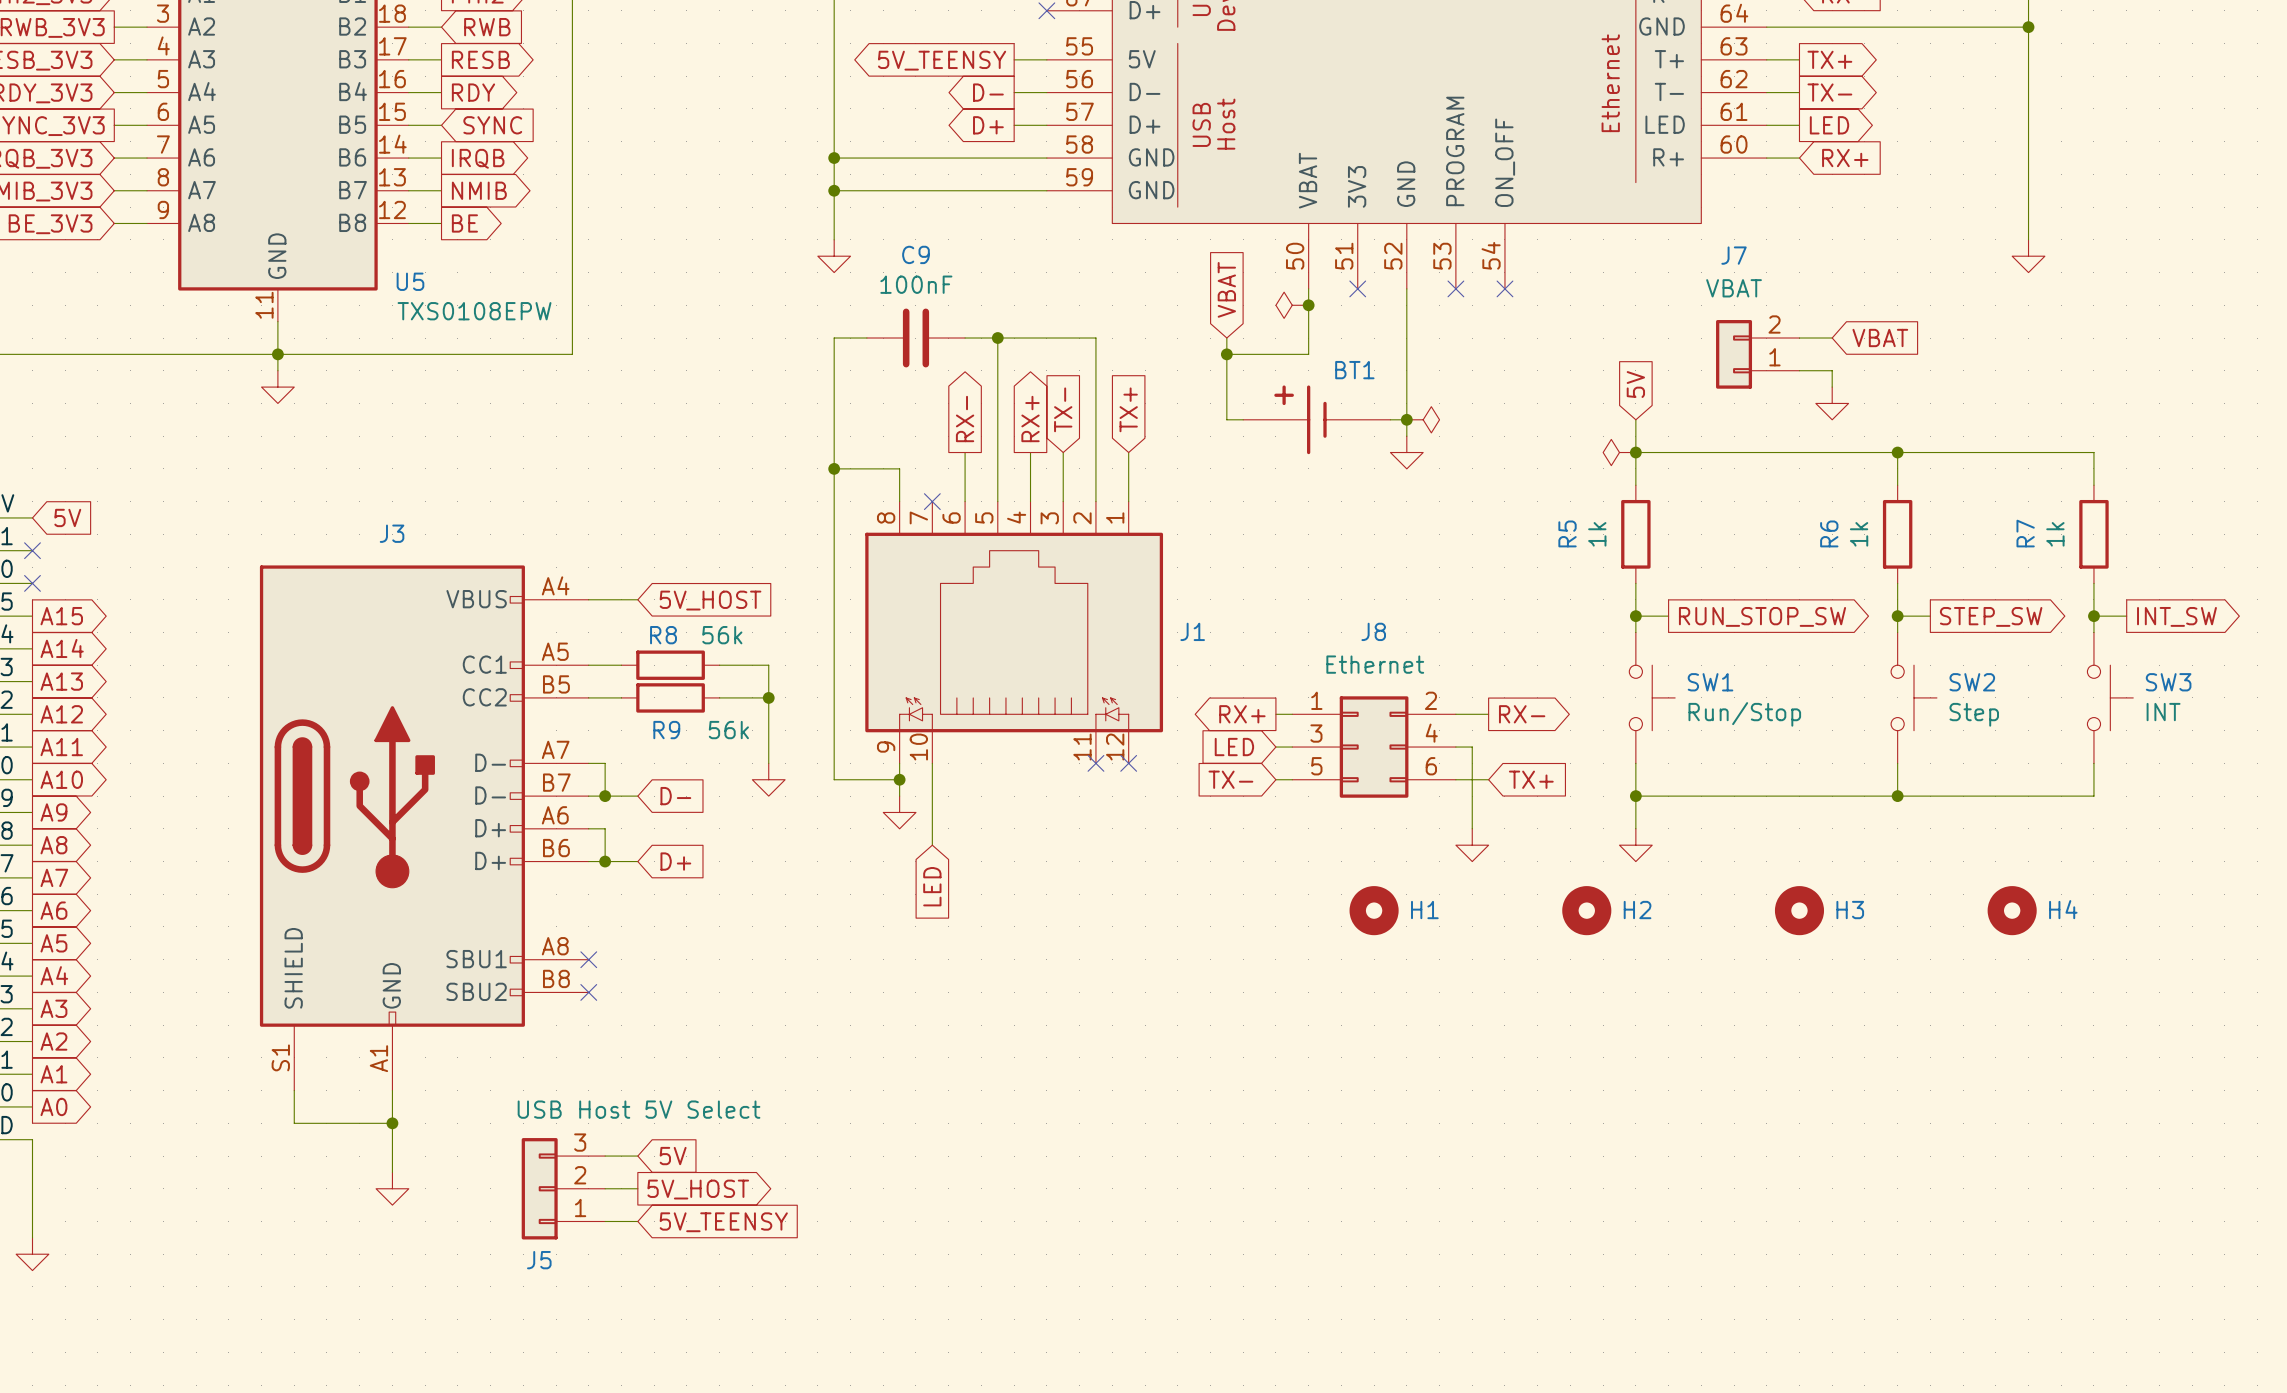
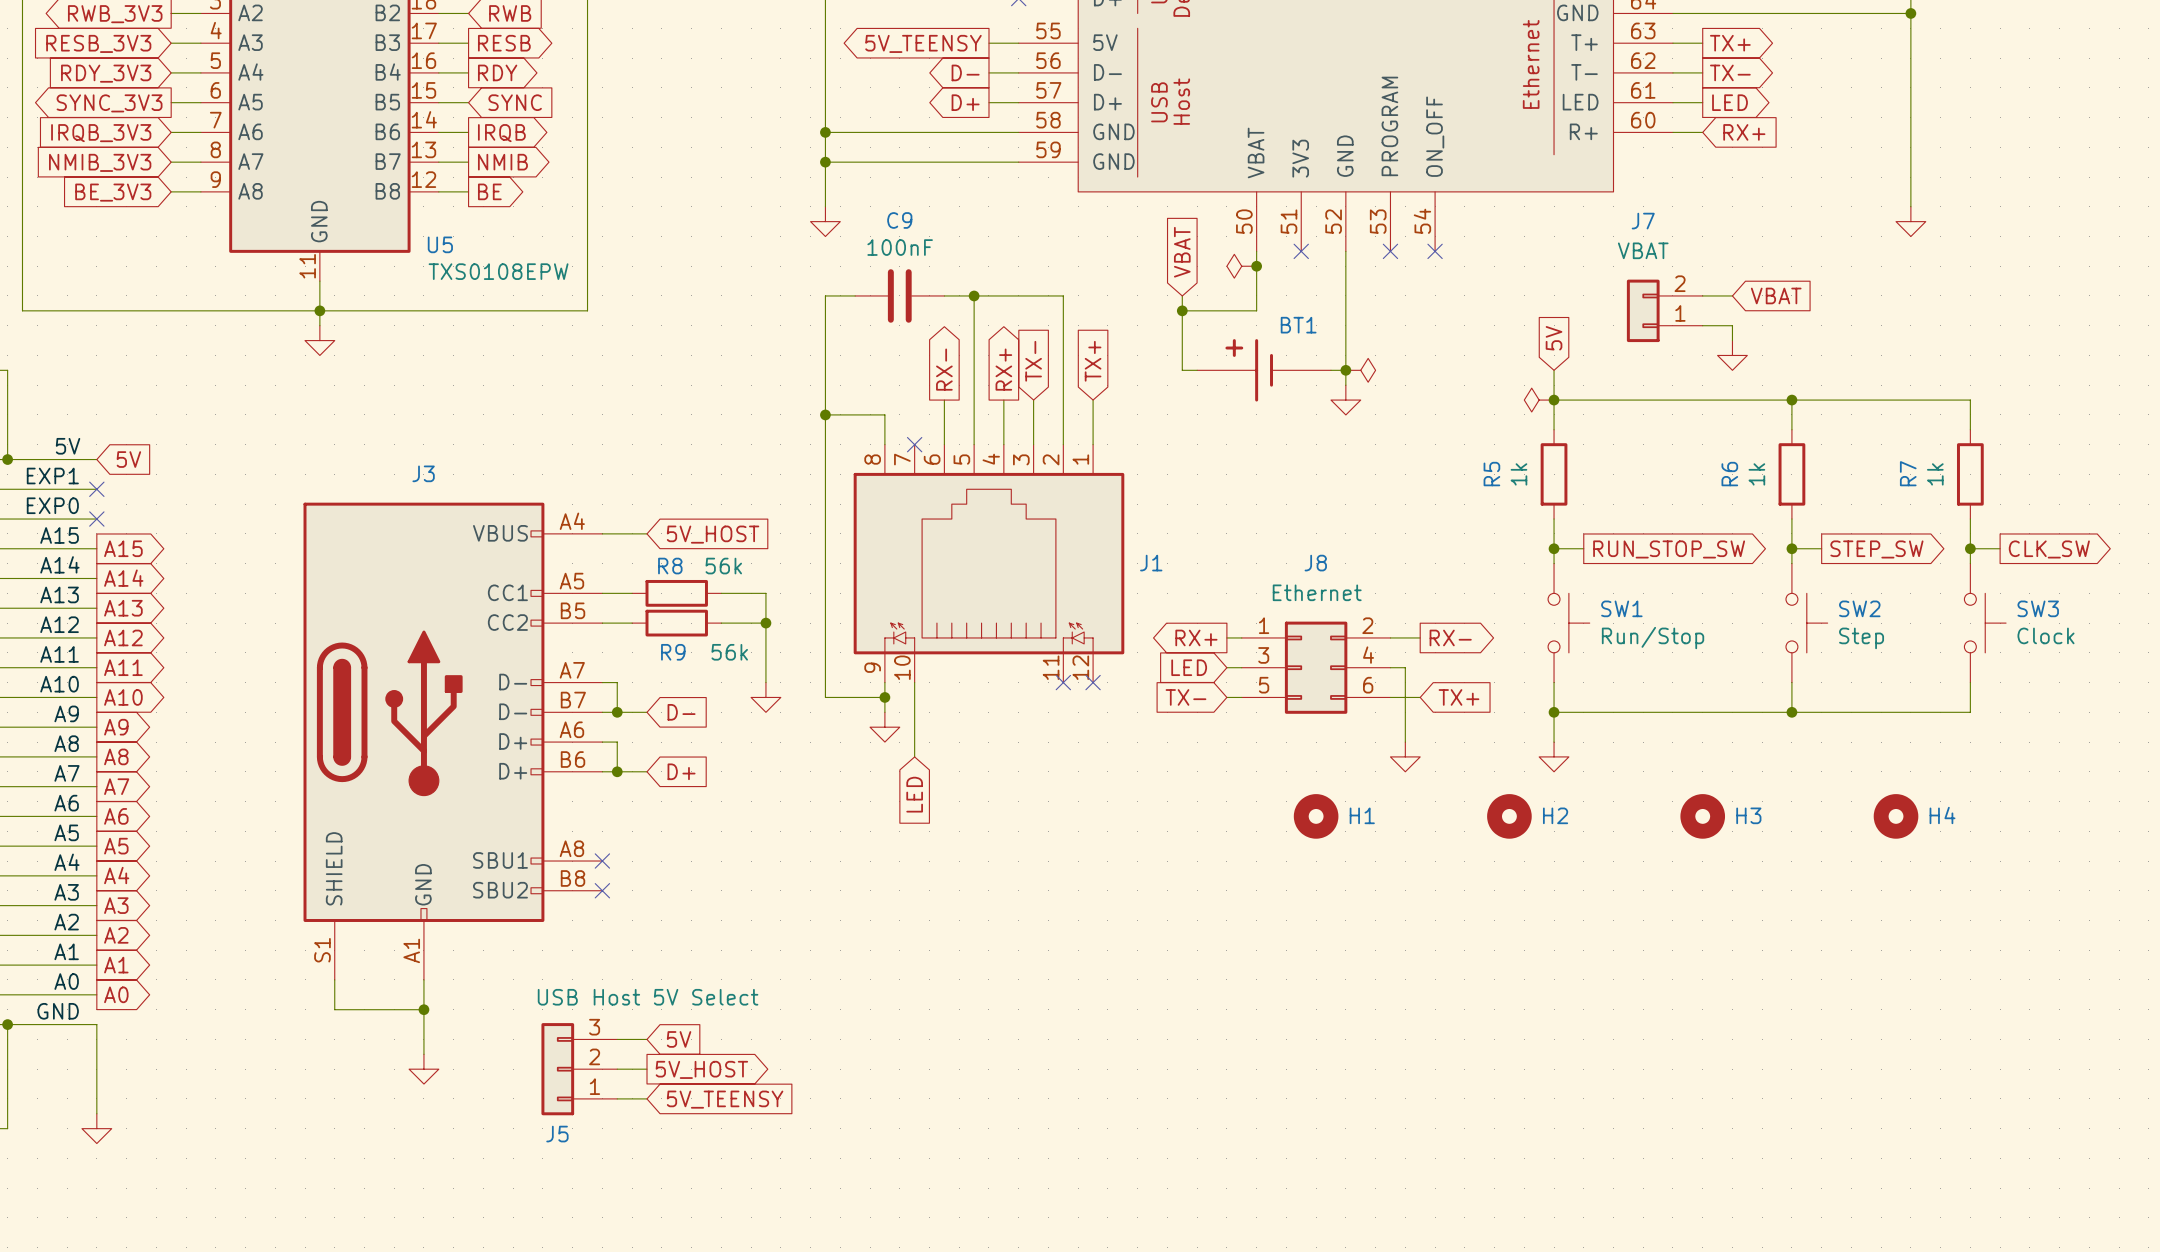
global label: INT_SW (2176, 616) -> CLK_SW (2049, 549)
SW3 value: INT (2163, 712) -> Clock (2046, 635)

